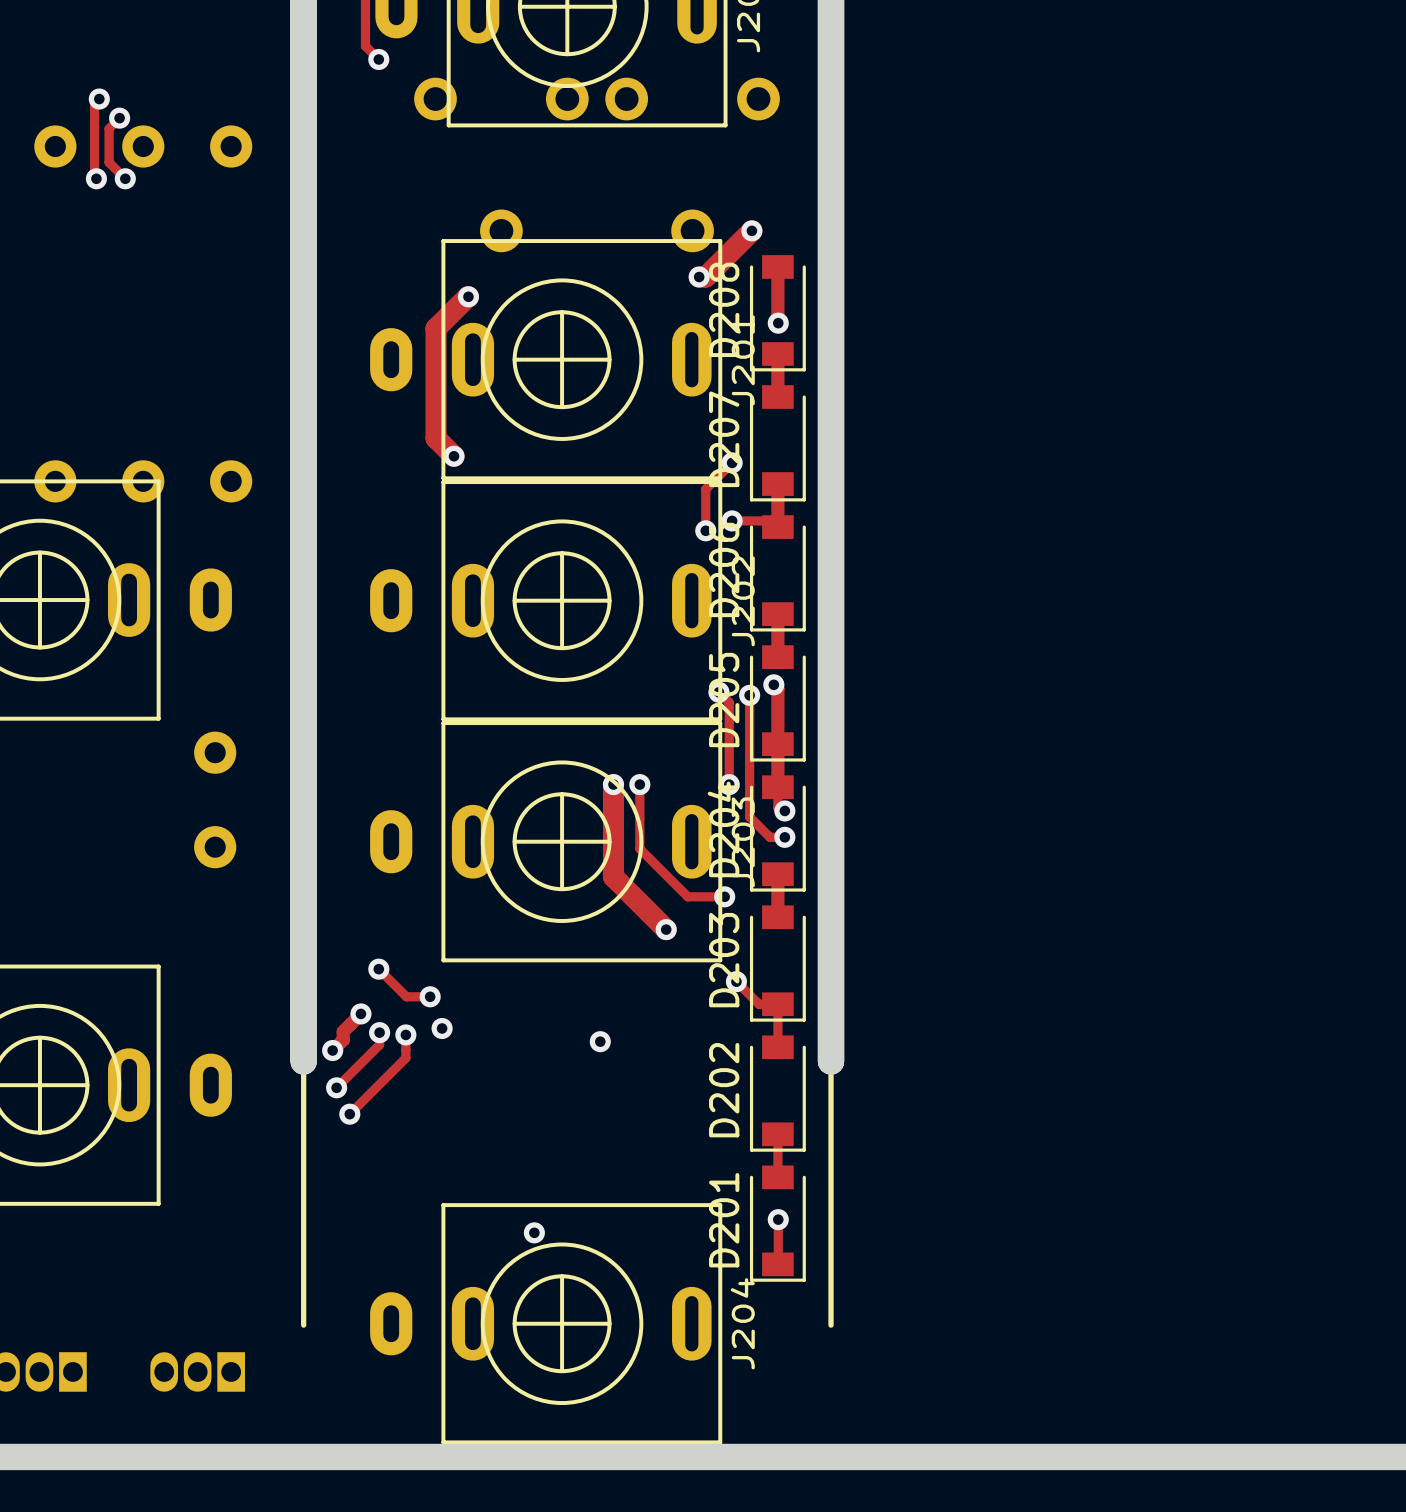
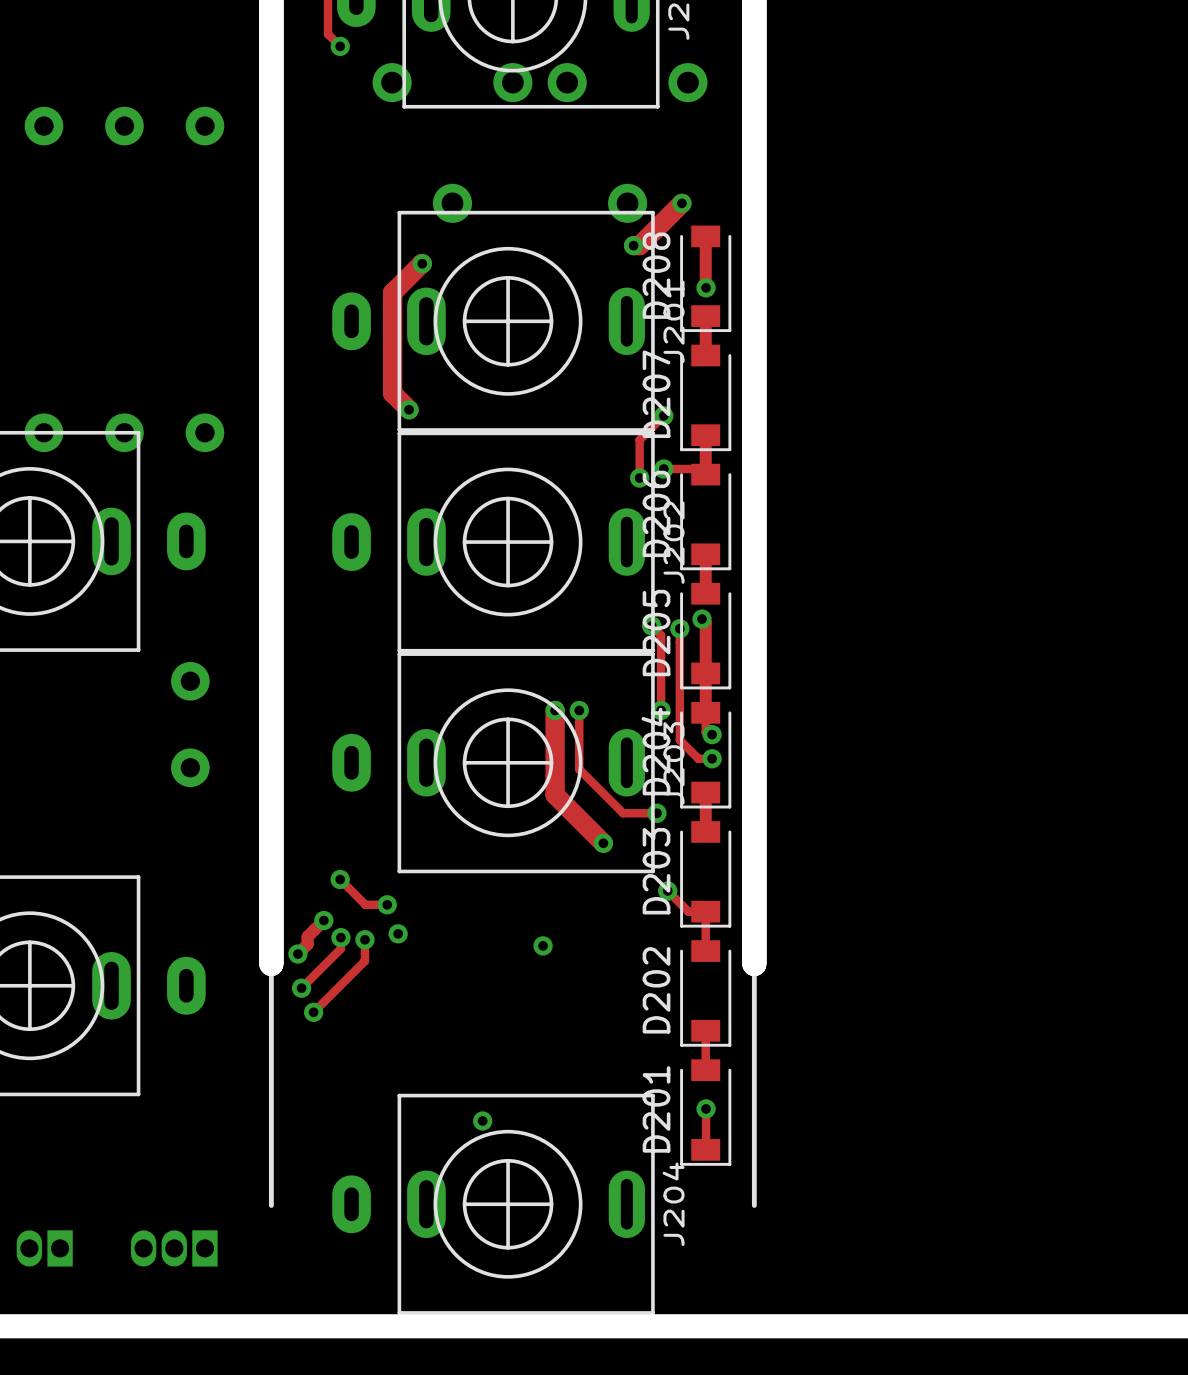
track: (99, 99) (94, 103) (94, 176) (96, 178) -> none
via: (99, 99) -> none
track: (119, 118) (109, 128) (109, 162) (125, 178) -> none
via: (119, 118) -> none
via: (96, 178) -> none
via: (125, 178) -> none

